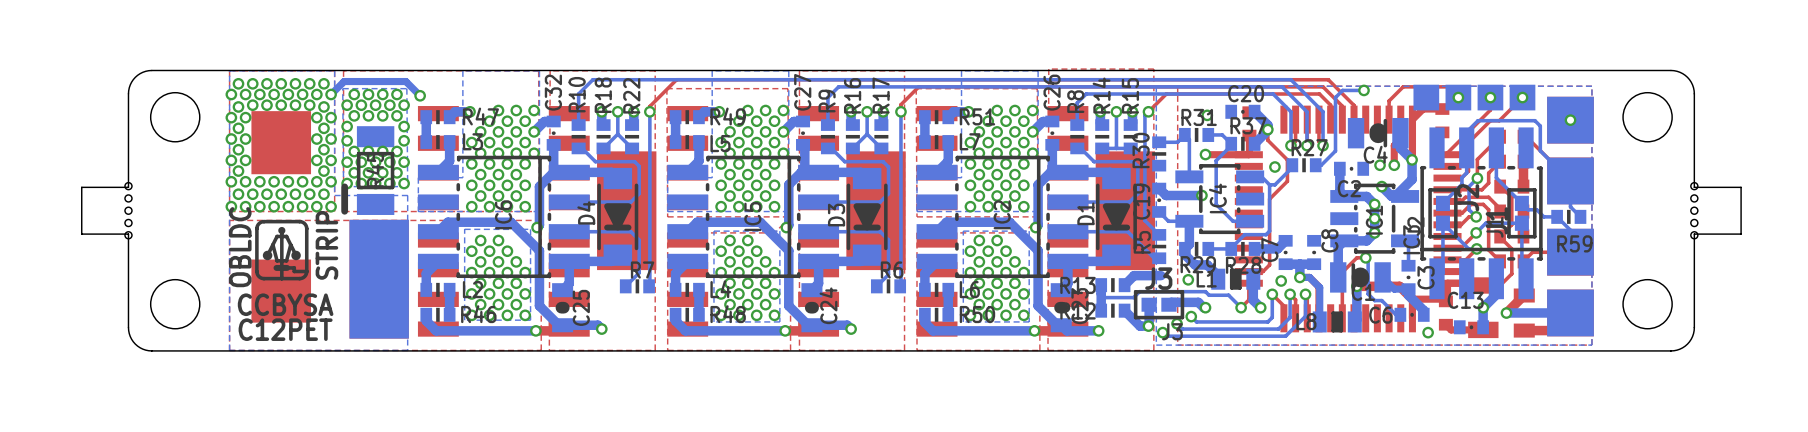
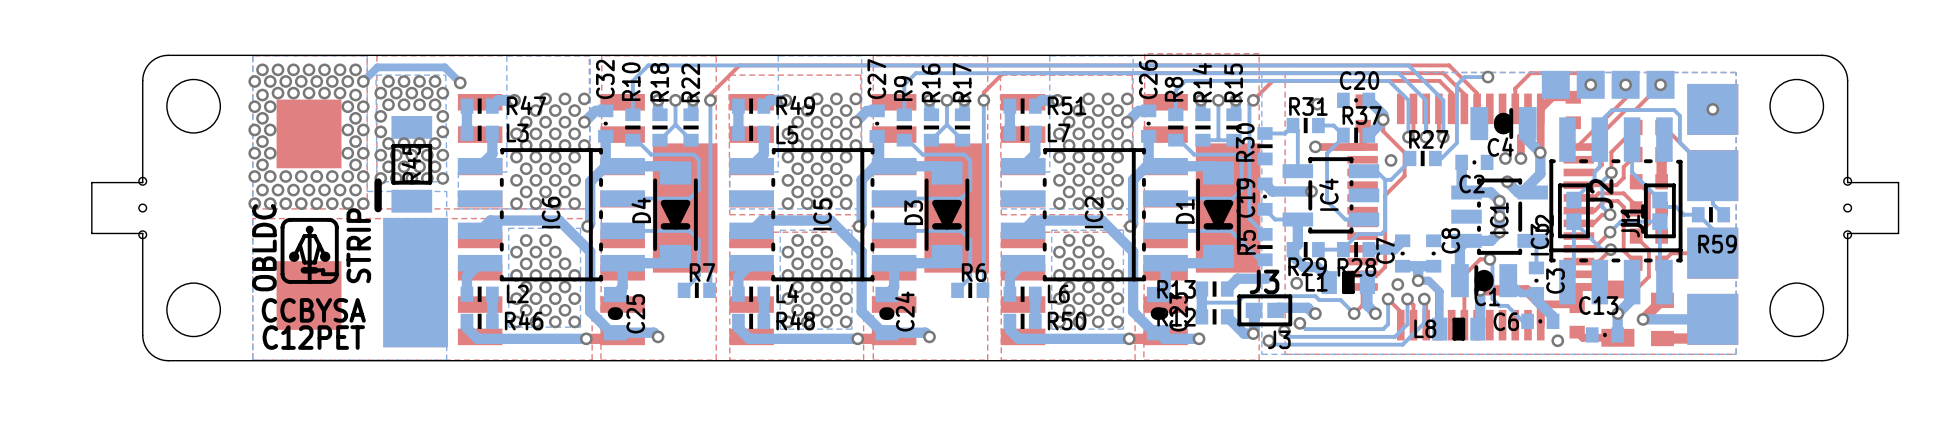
hole: (128, 198) -> none
hole: (1694, 198) -> none
hole: (128, 223) -> none
hole: (1694, 223) -> none

